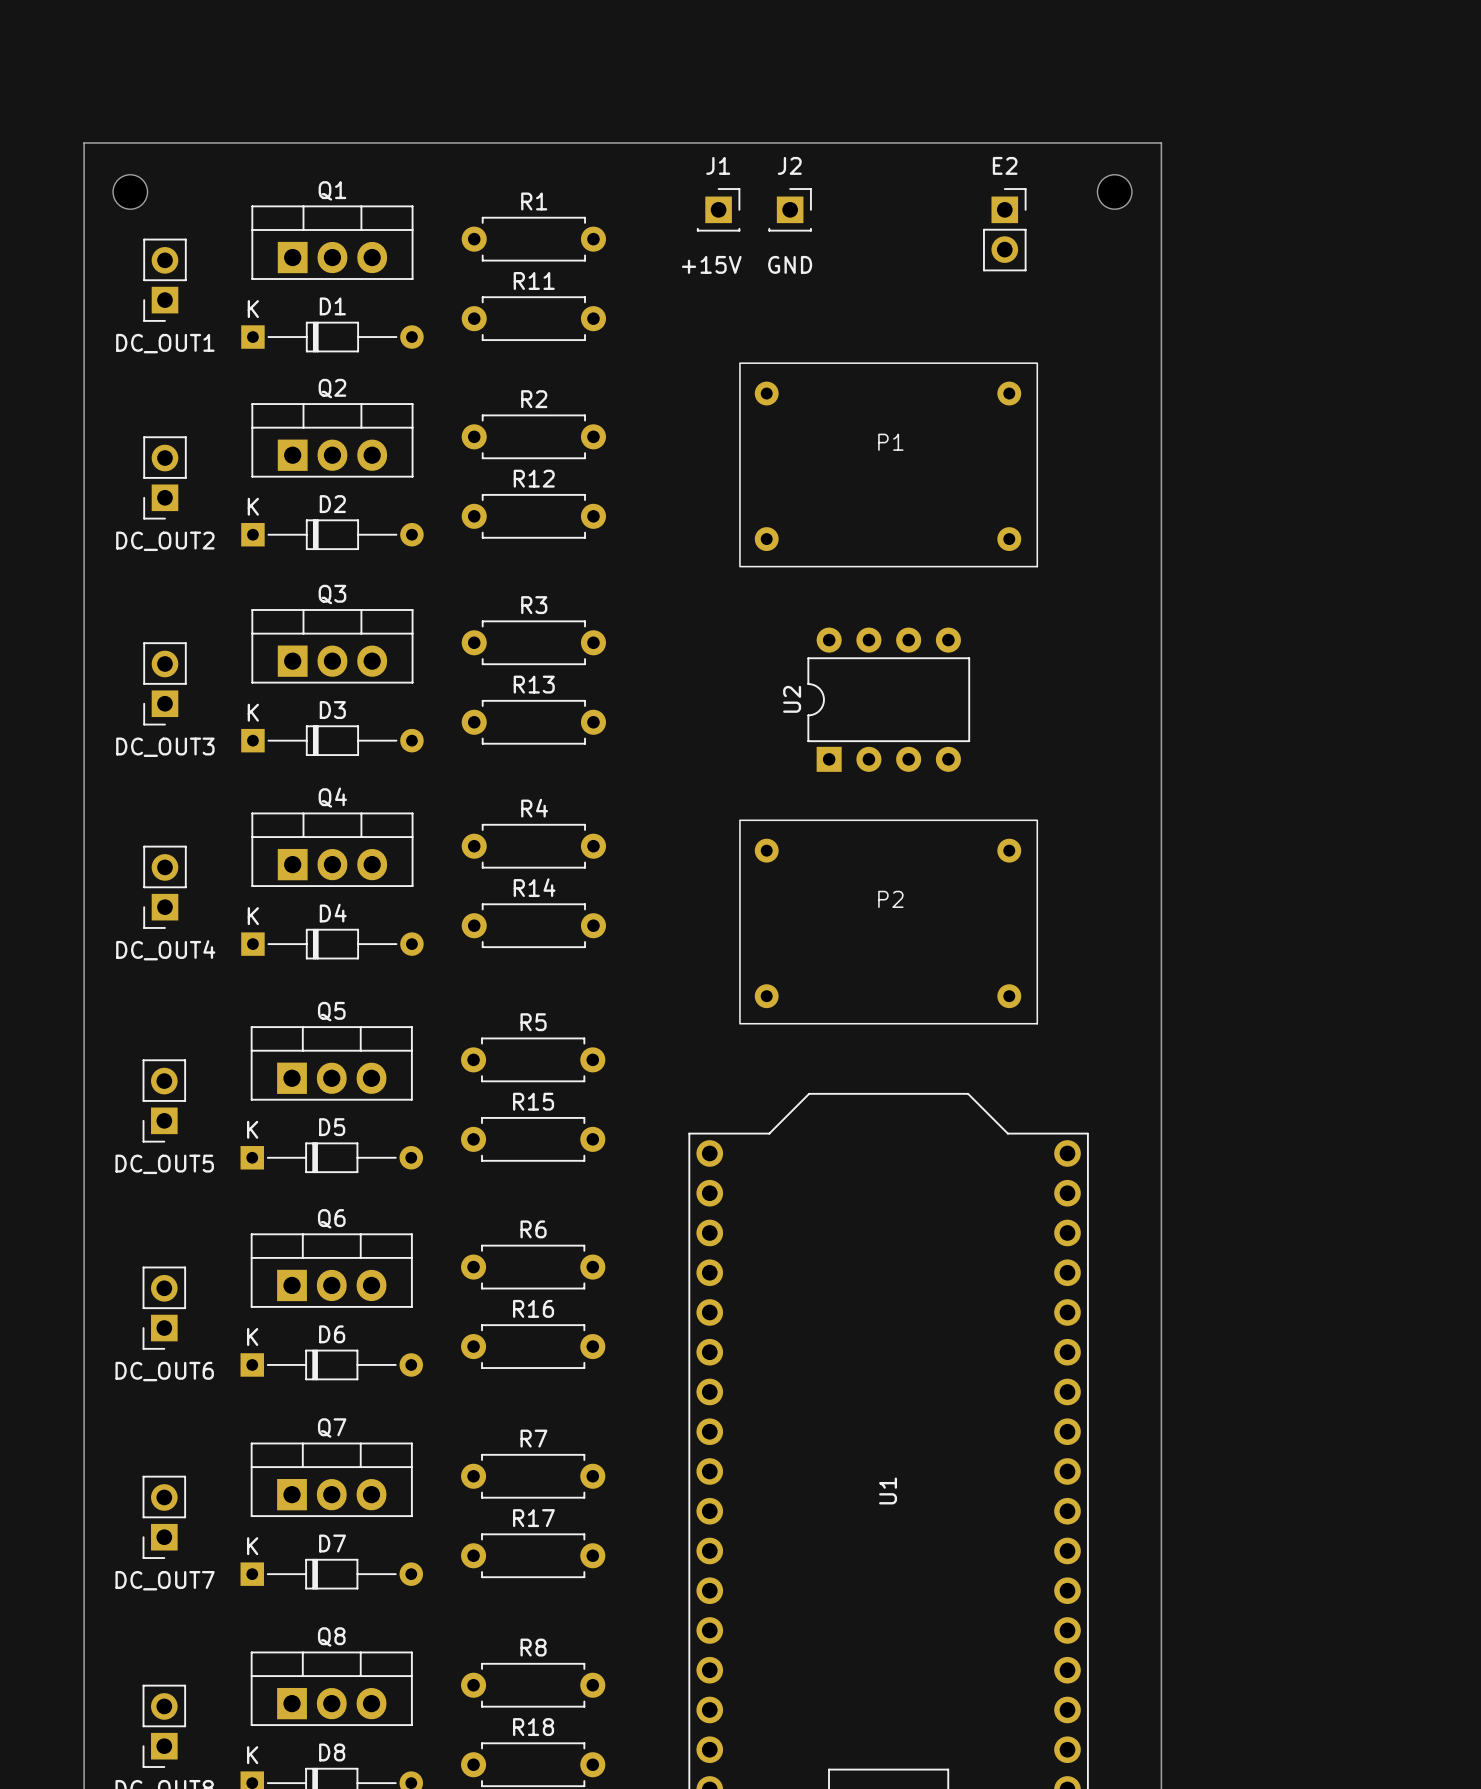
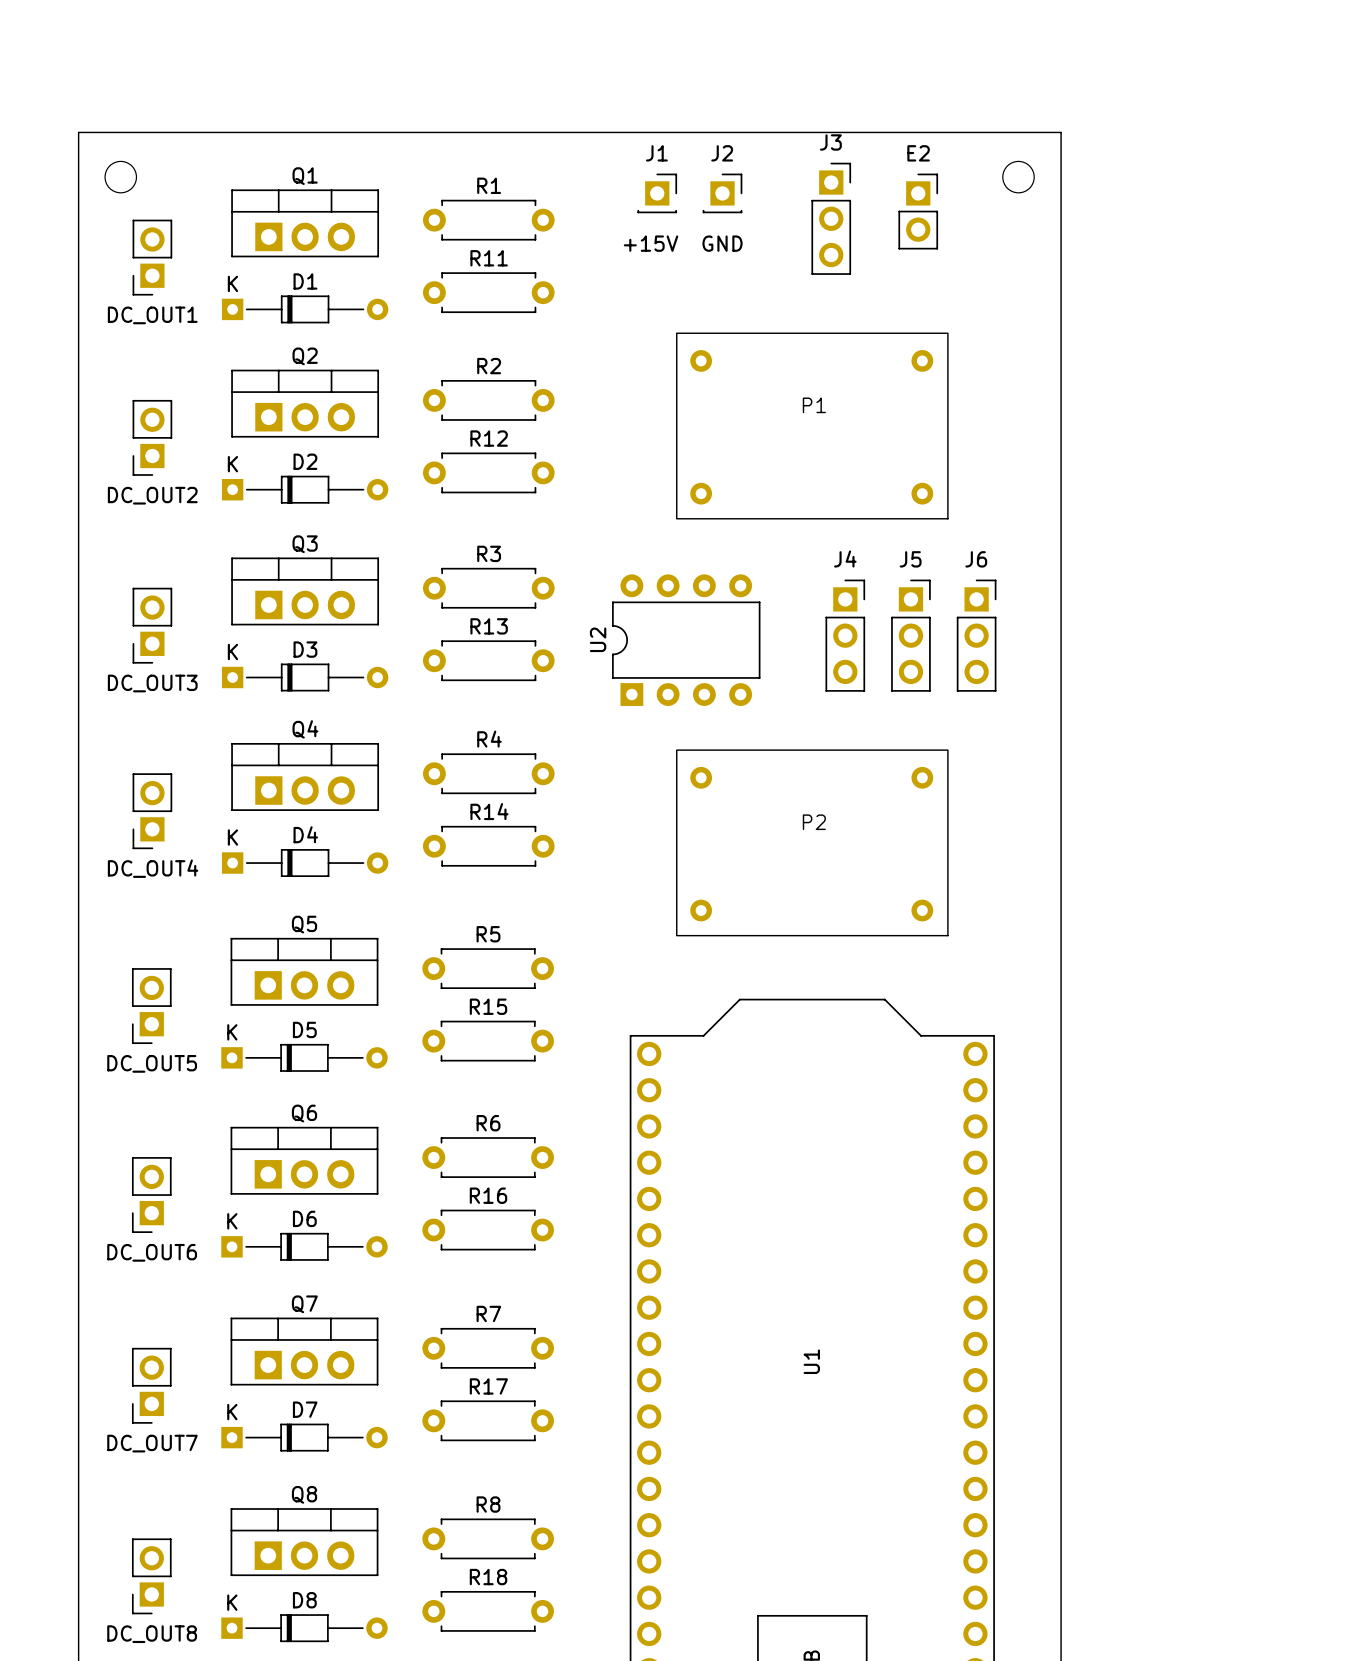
J3: none -> (831, 218)
J4: none -> (845, 635)
J5: none -> (910, 635)
J6: none -> (976, 635)
U2 position: (888, 699) -> (686, 640)

